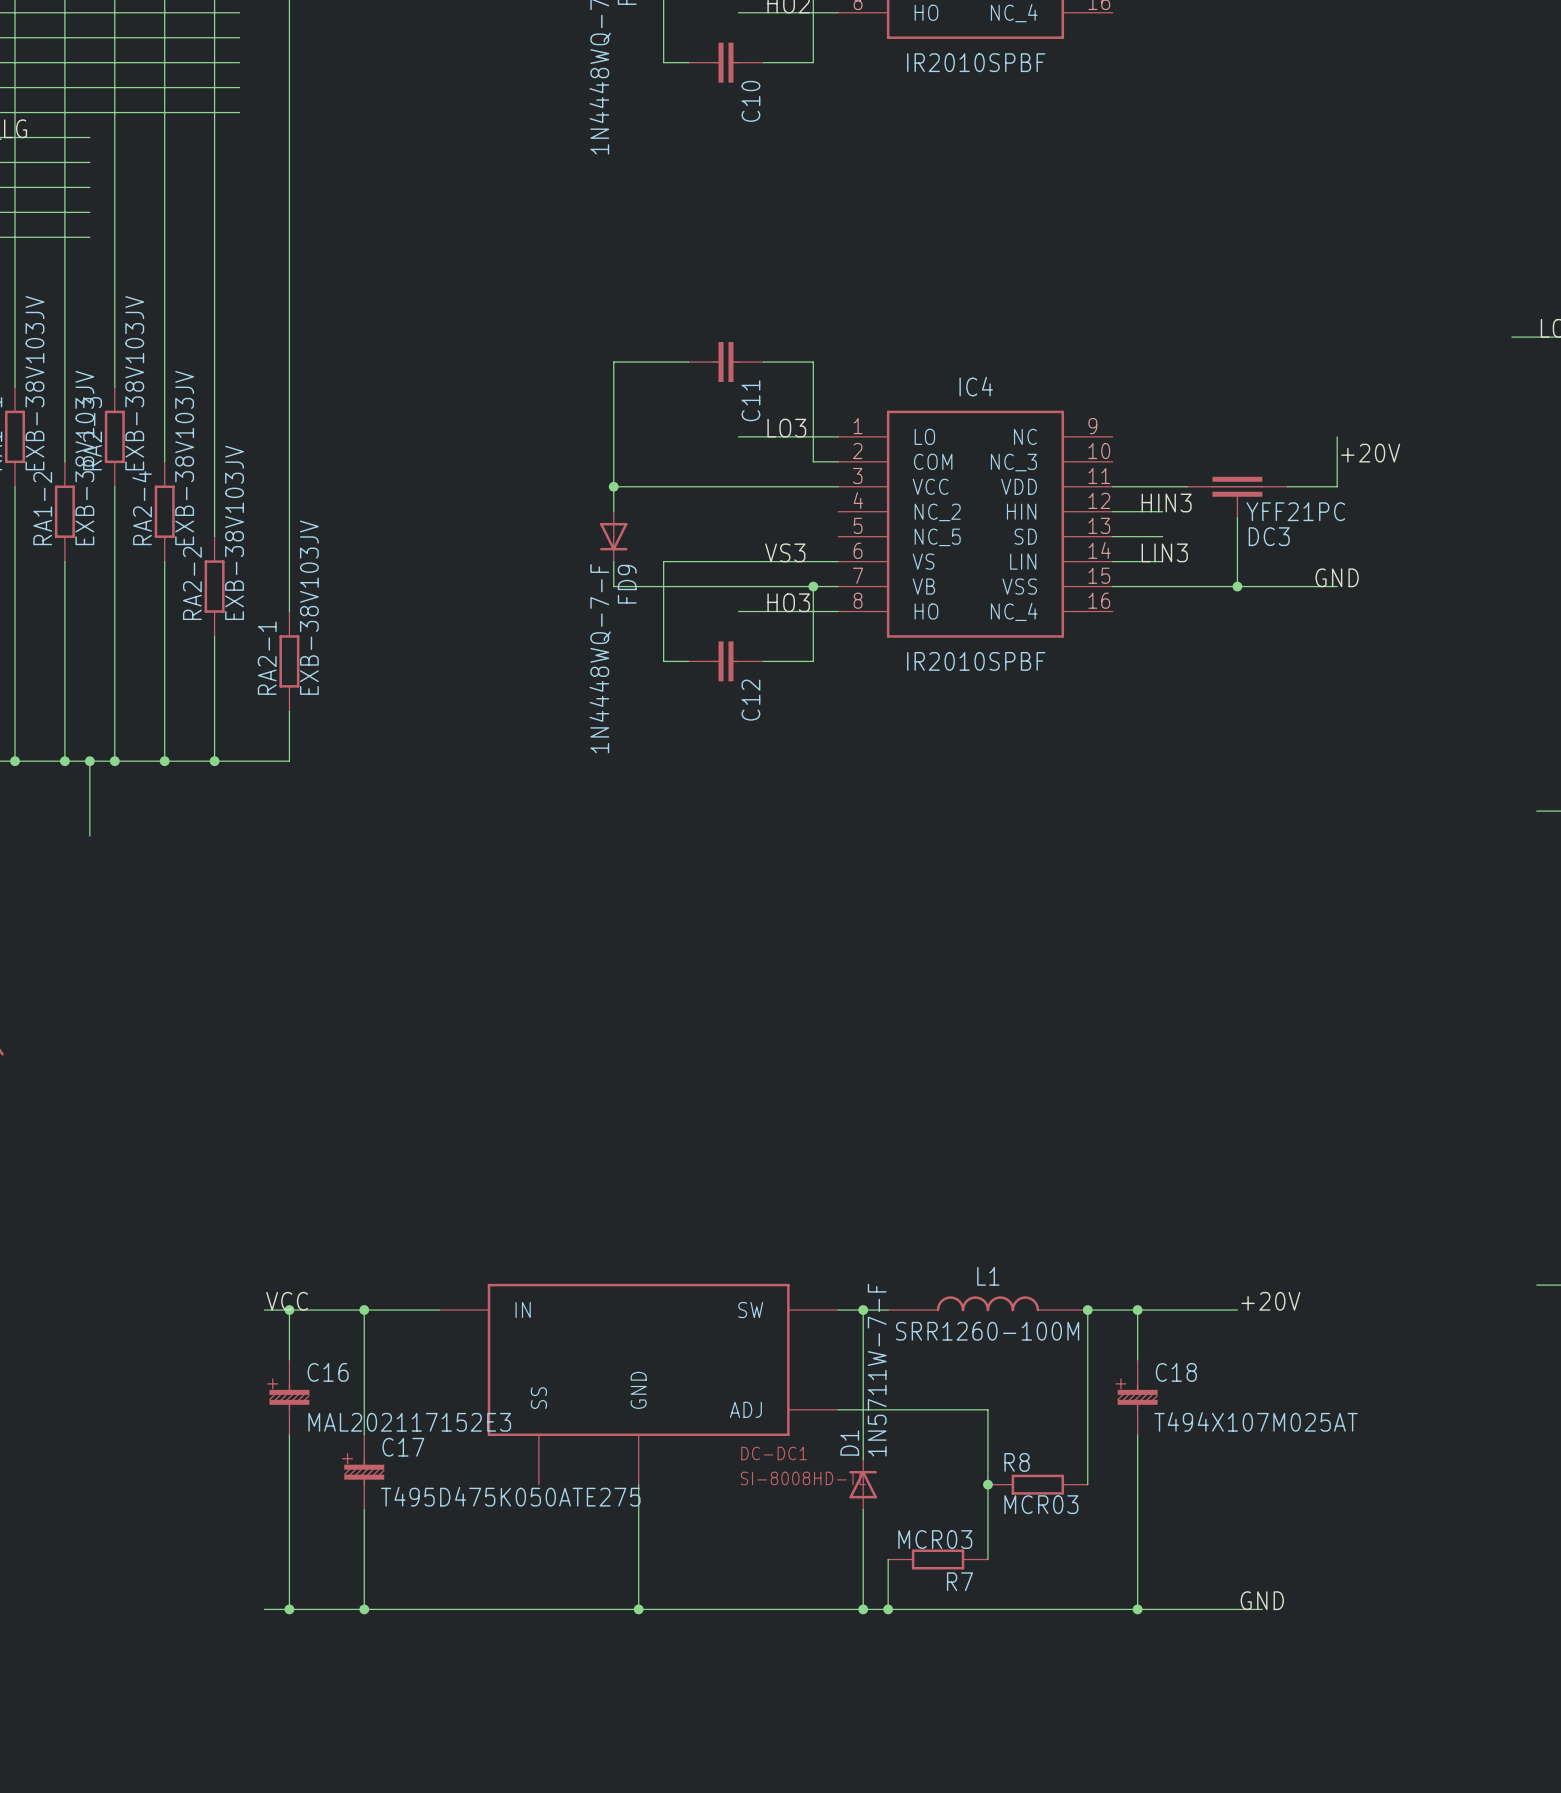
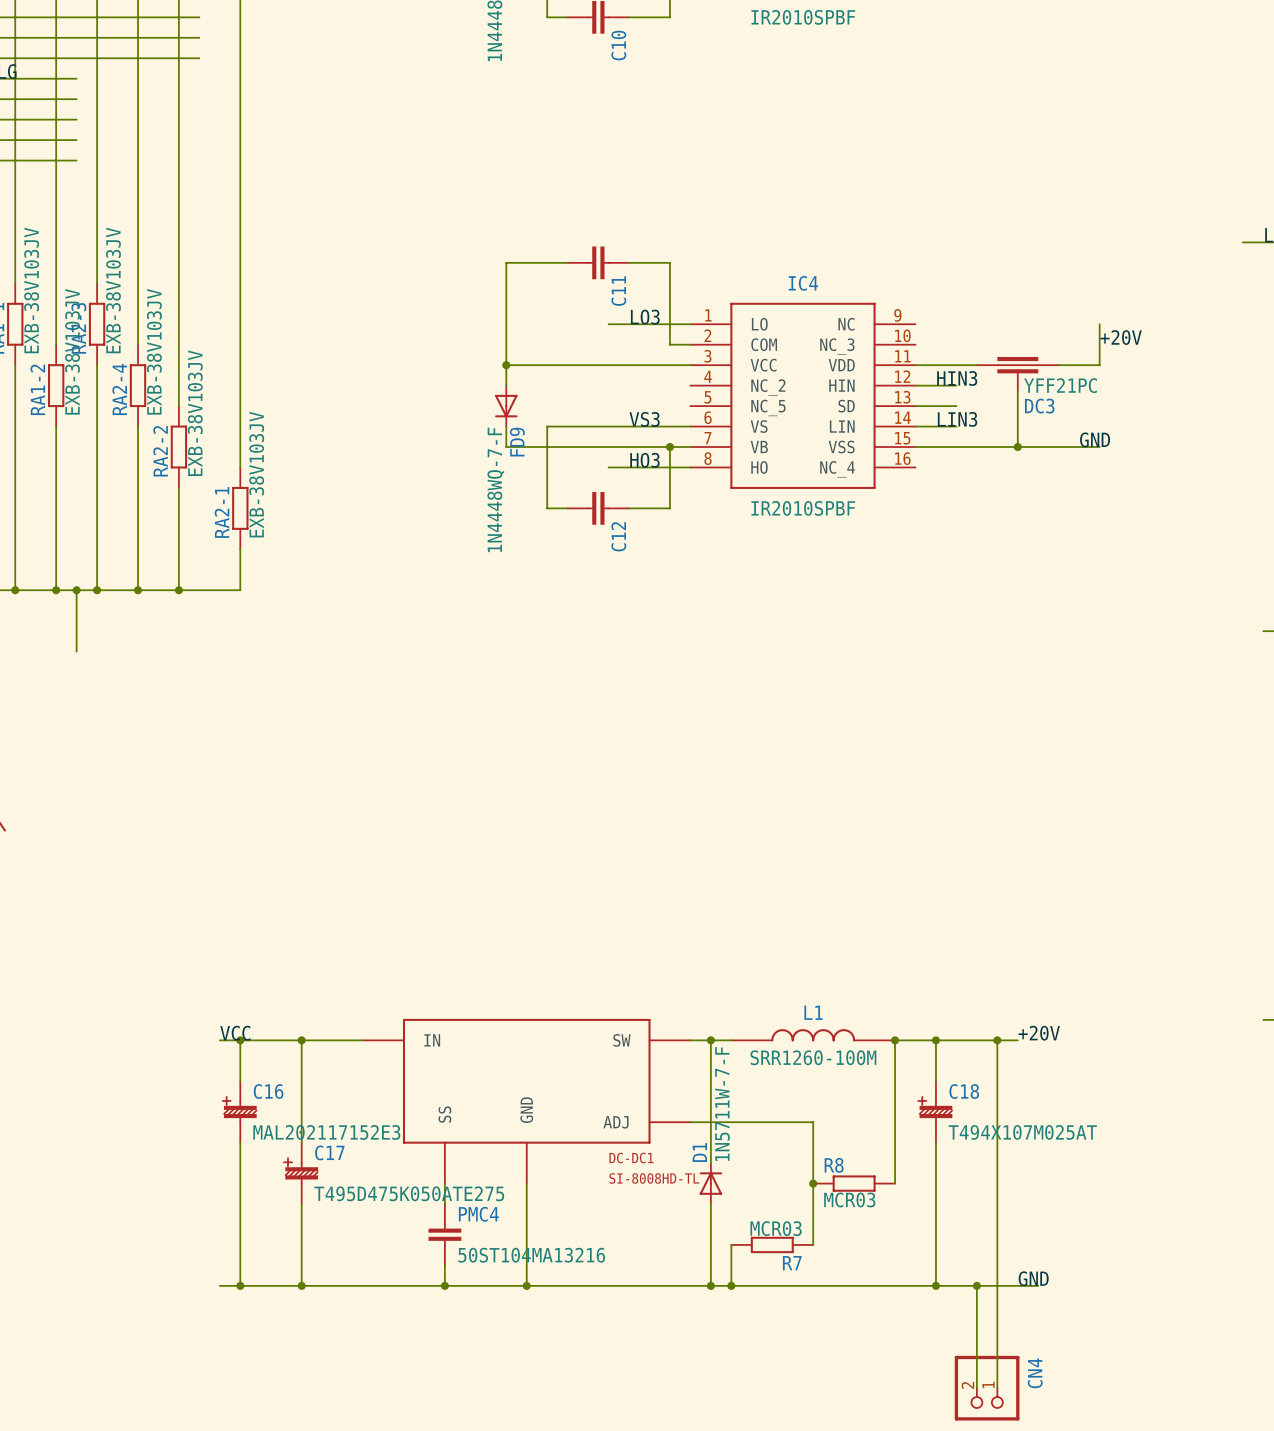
wire: none -> (997, 1040) (997, 1388)
junction: none -> (997, 1040)
wire: none -> (444, 1183) (444, 1204)
PMC4: none -> 50ST104MA13216 (444, 1234)
wire: none -> (444, 1265) (444, 1285)
junction: none -> (444, 1285)
wire: none -> (976, 1285) (976, 1388)
junction: none -> (976, 1285)
CN4: none -> (987, 1388)

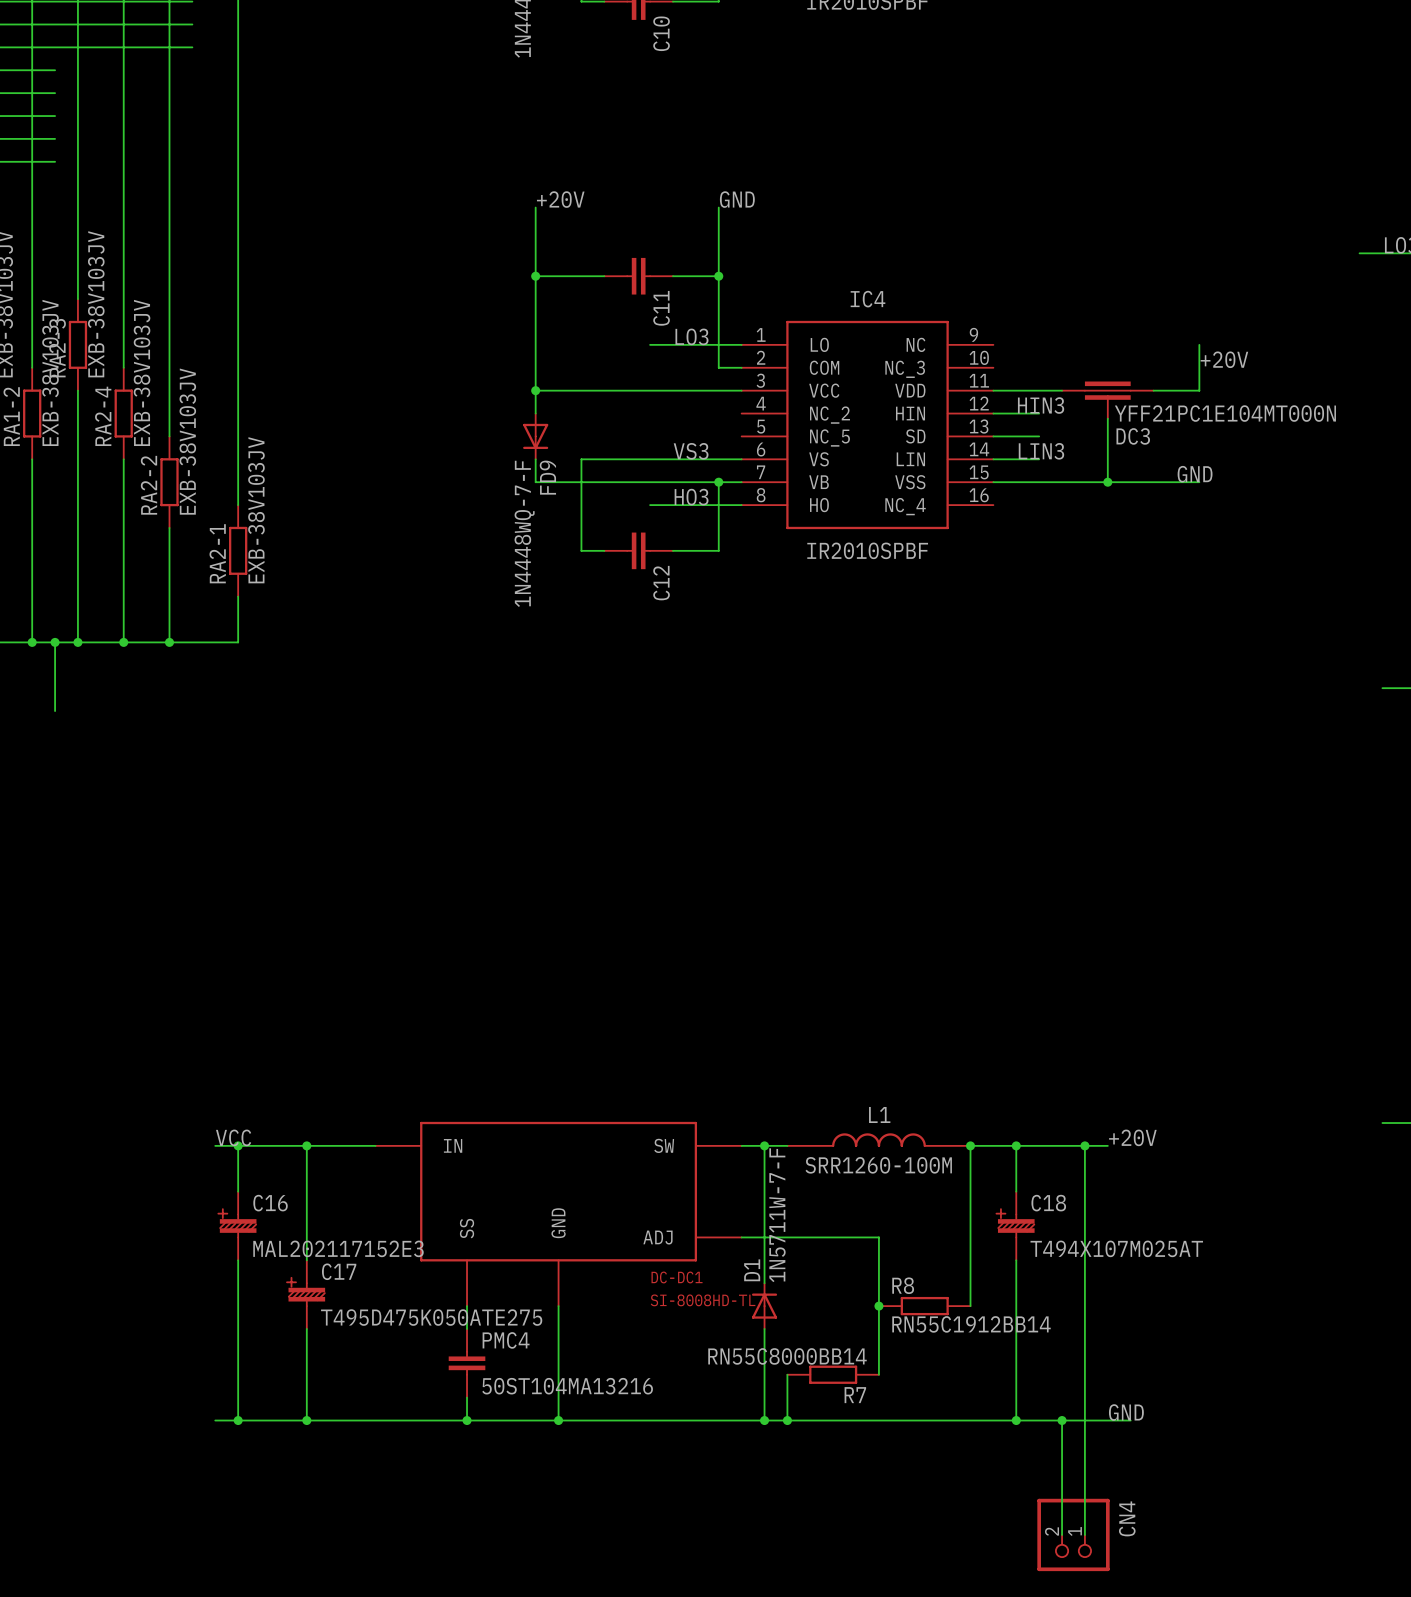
label: none -> +20V (560, 199)
label: none -> GND (737, 199)
wire: none -> (535, 207) (535, 276)
wire: none -> (718, 207) (718, 276)
junction: none -> (535, 276)
junction: none -> (718, 276)
DC3 value: YFF21PC (1060, 385) -> YFF21PC1E104MT000N (1225, 413)
R8 value: MCR03 (849, 1199) -> RN55C1912BB14 (971, 1324)
R7 value: MCR03 (776, 1228) -> RN55C8000BB14 (787, 1356)

